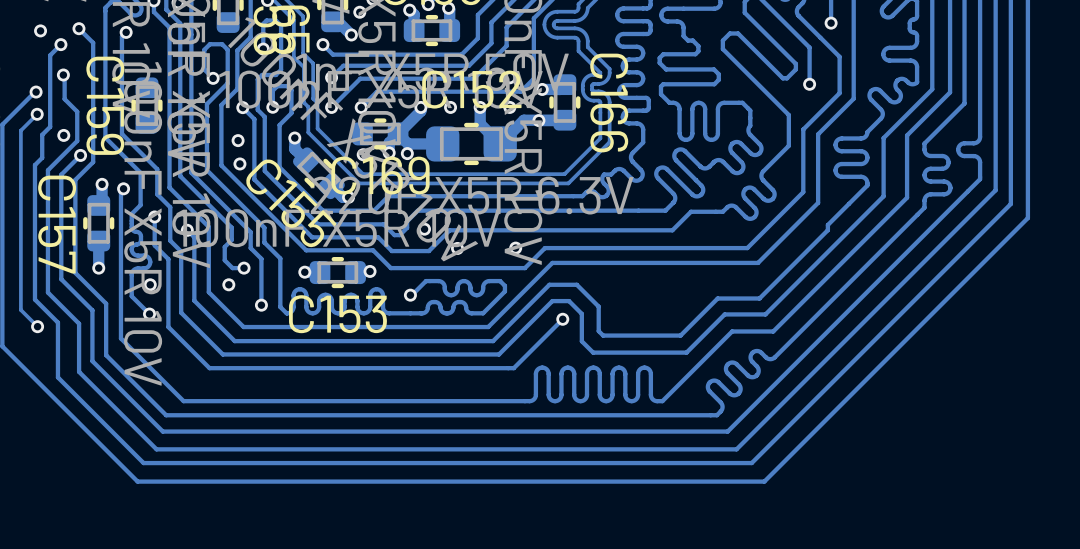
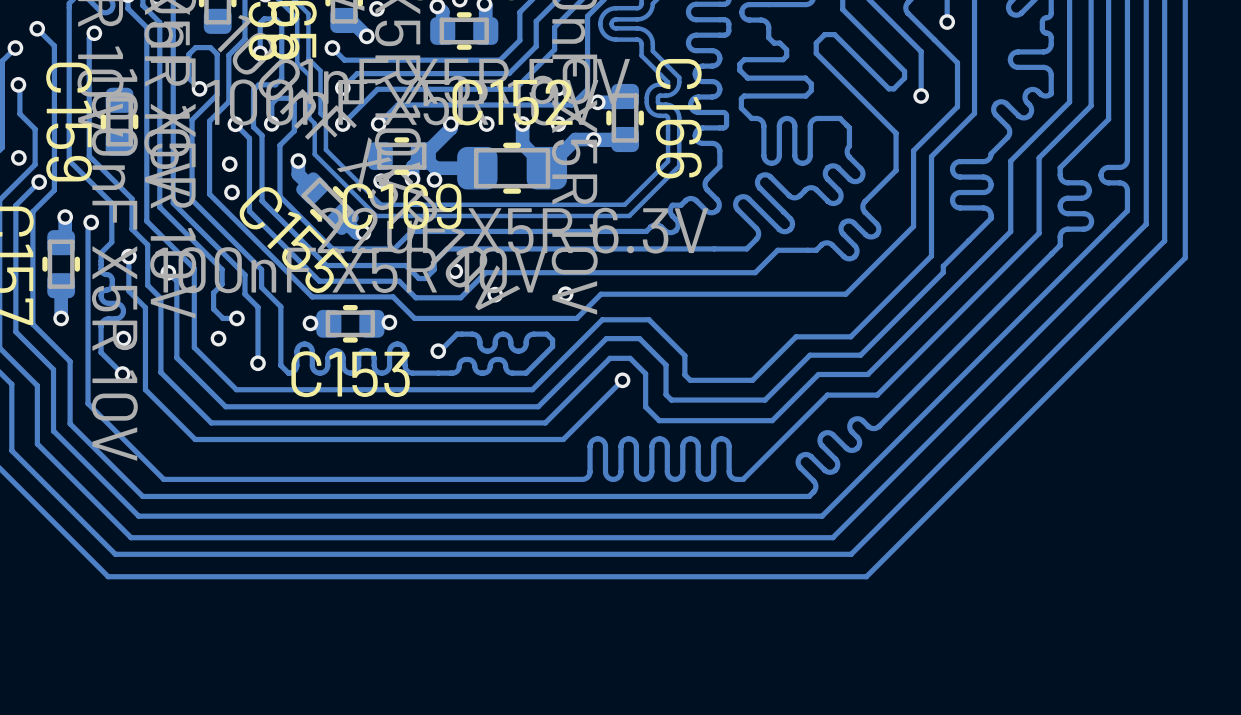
track: (818, 202) (758, 262) (552, 262) (546, 269) -> (931, 239) (931, 256) (850, 336) (796, 336) (752, 380) (690, 380) (684, 374) (684, 355) (649, 319) (602, 319)

